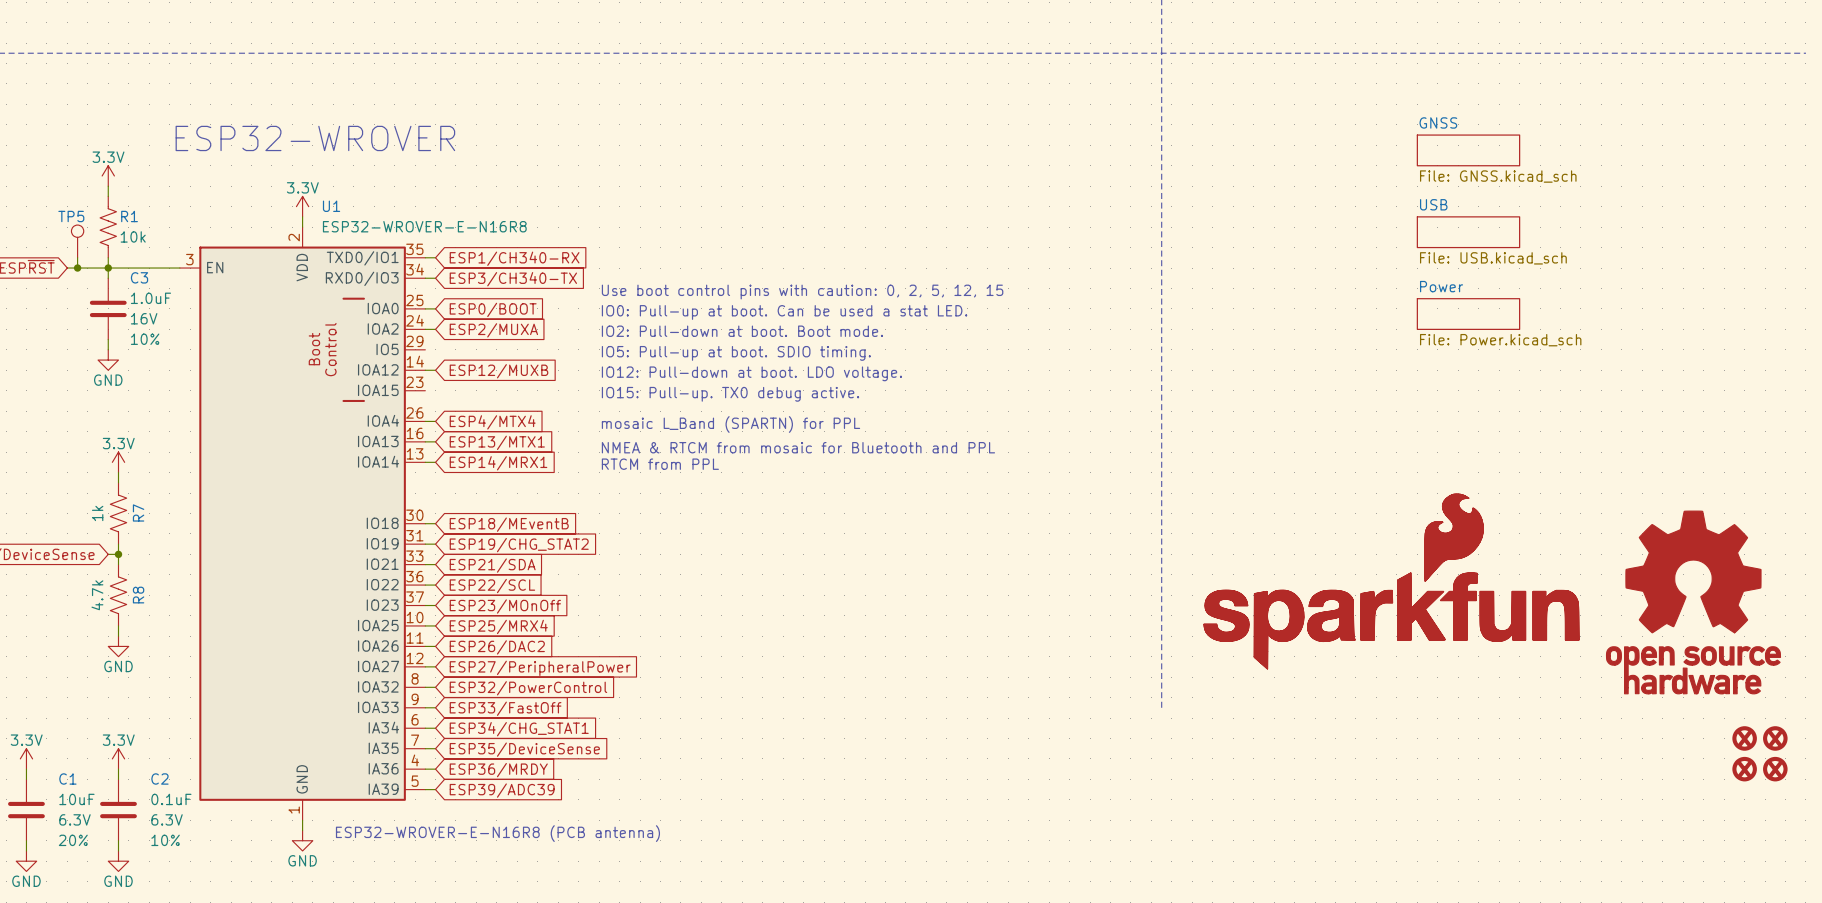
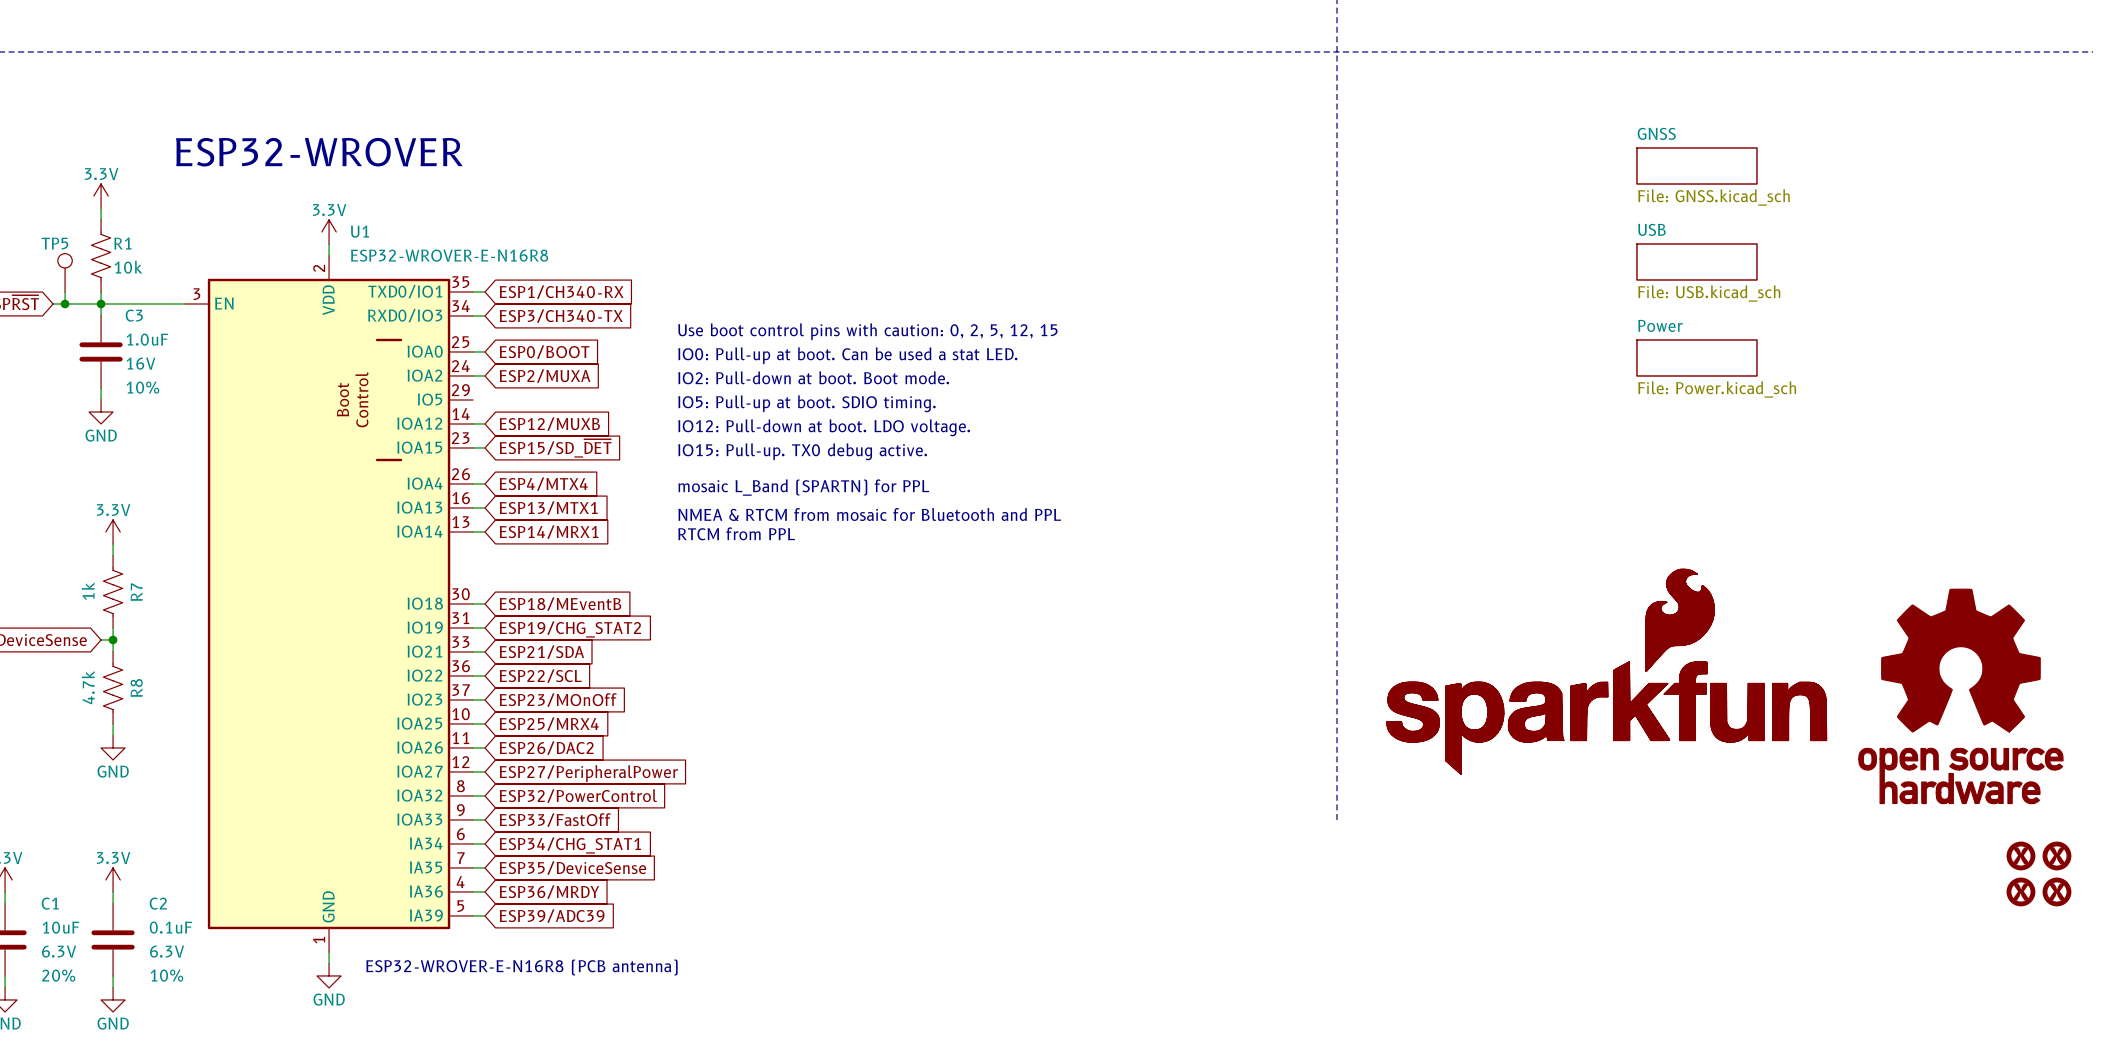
wire: none -> (473, 447) (485, 447)
global label: none -> ESP15/SD_~{DET} (555, 448)

